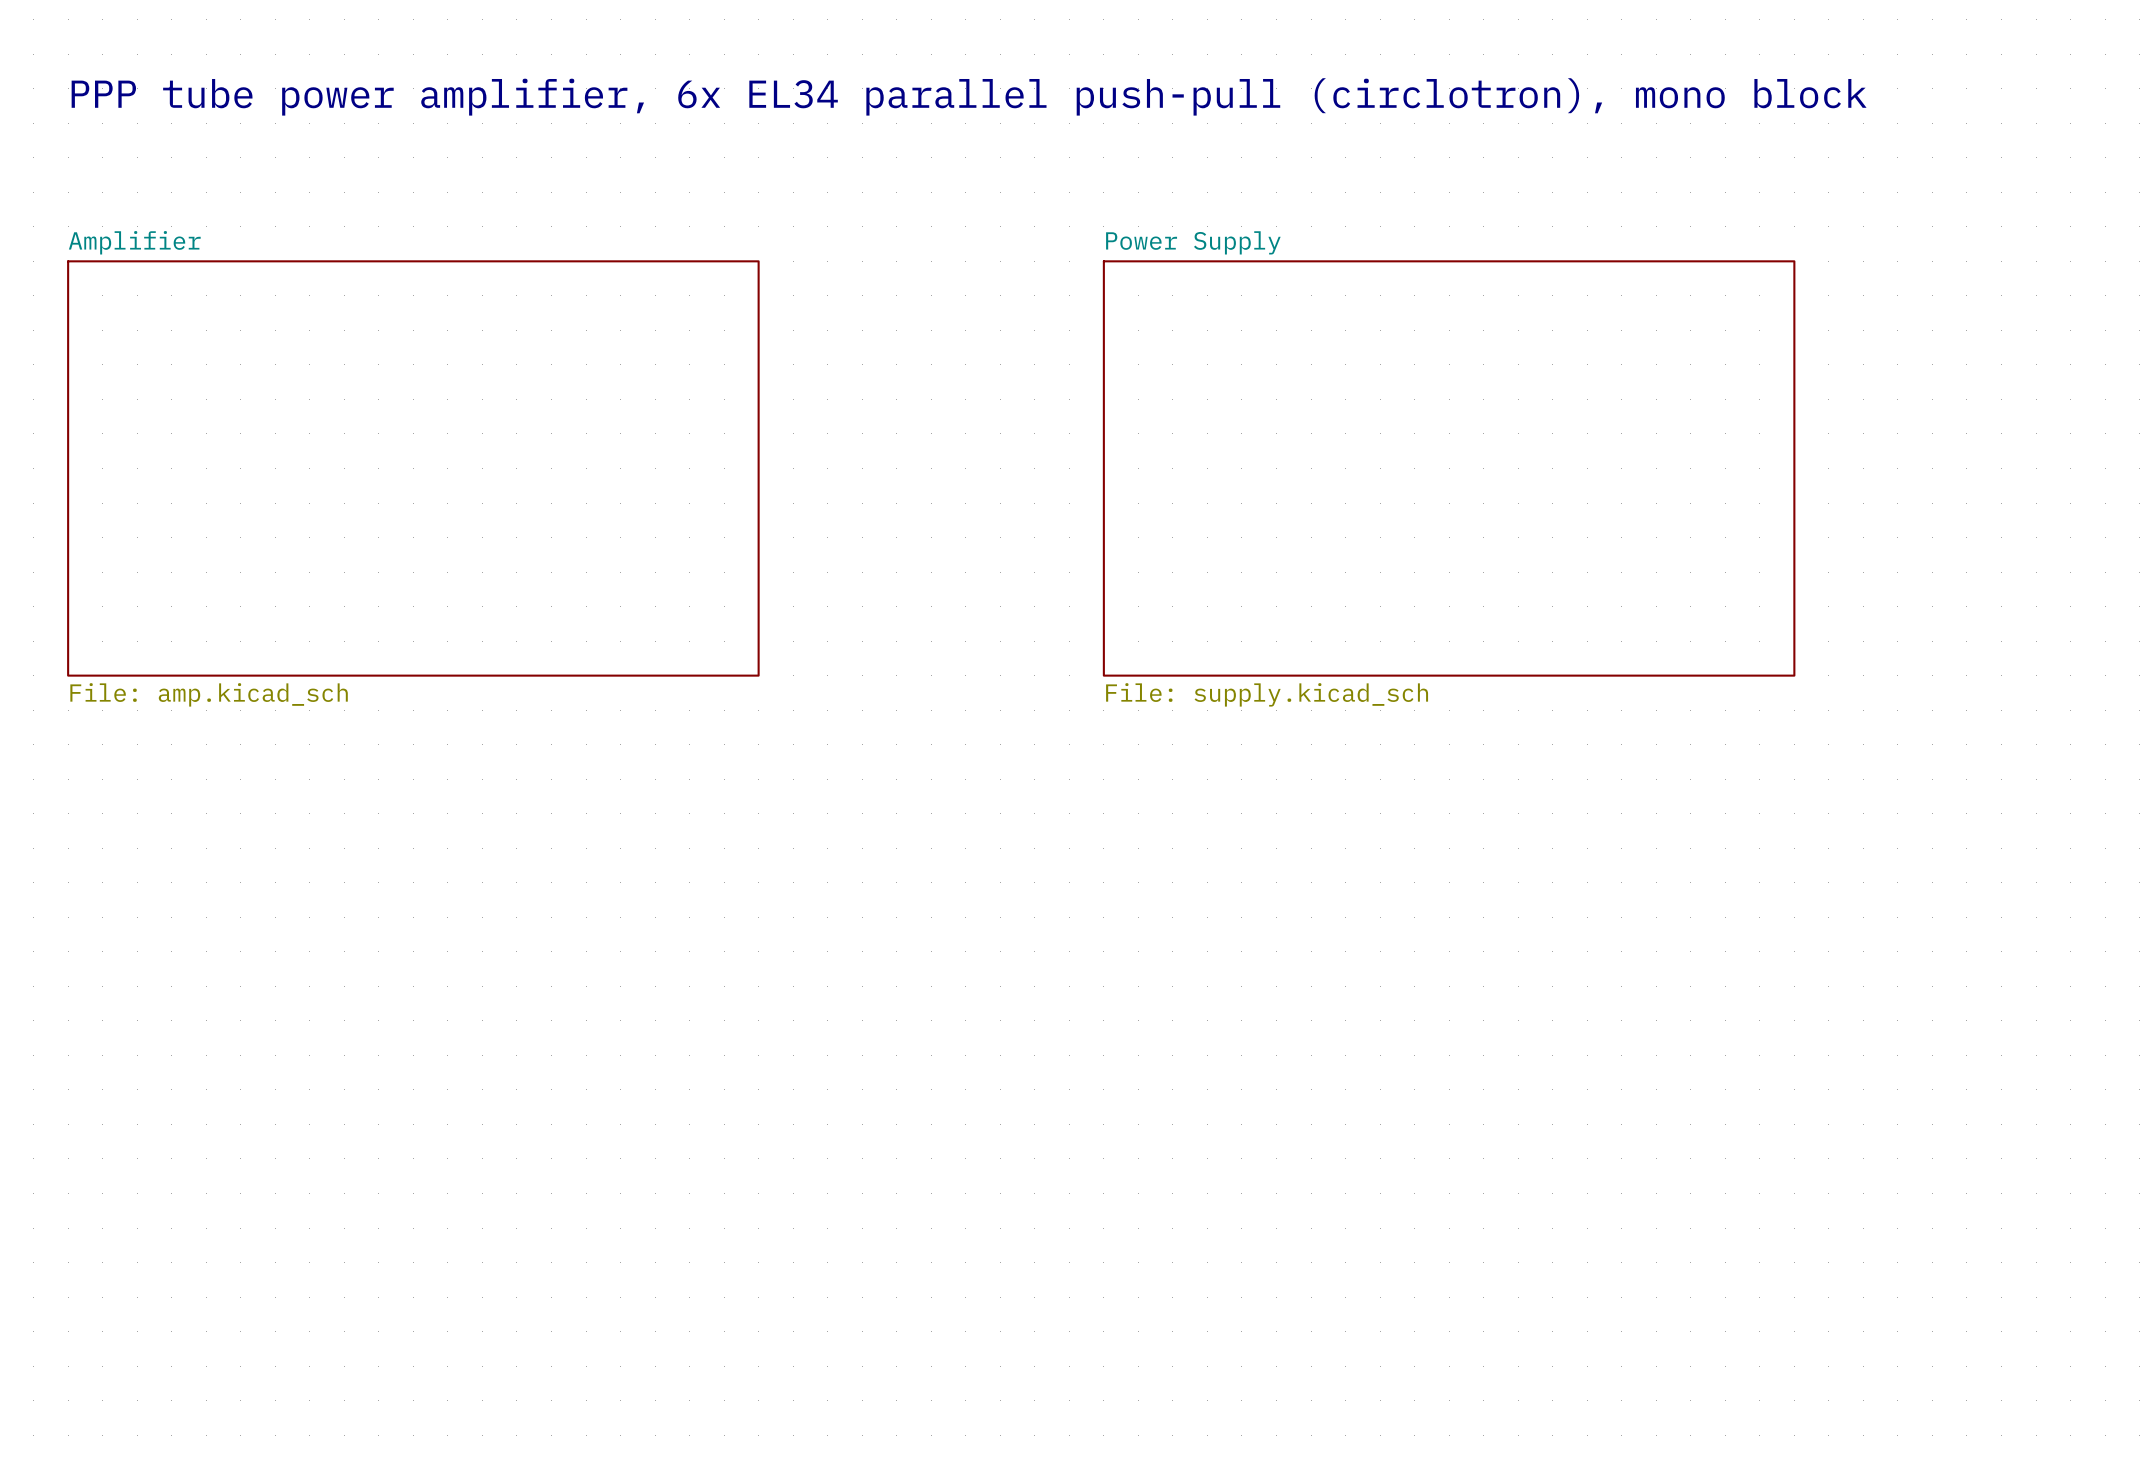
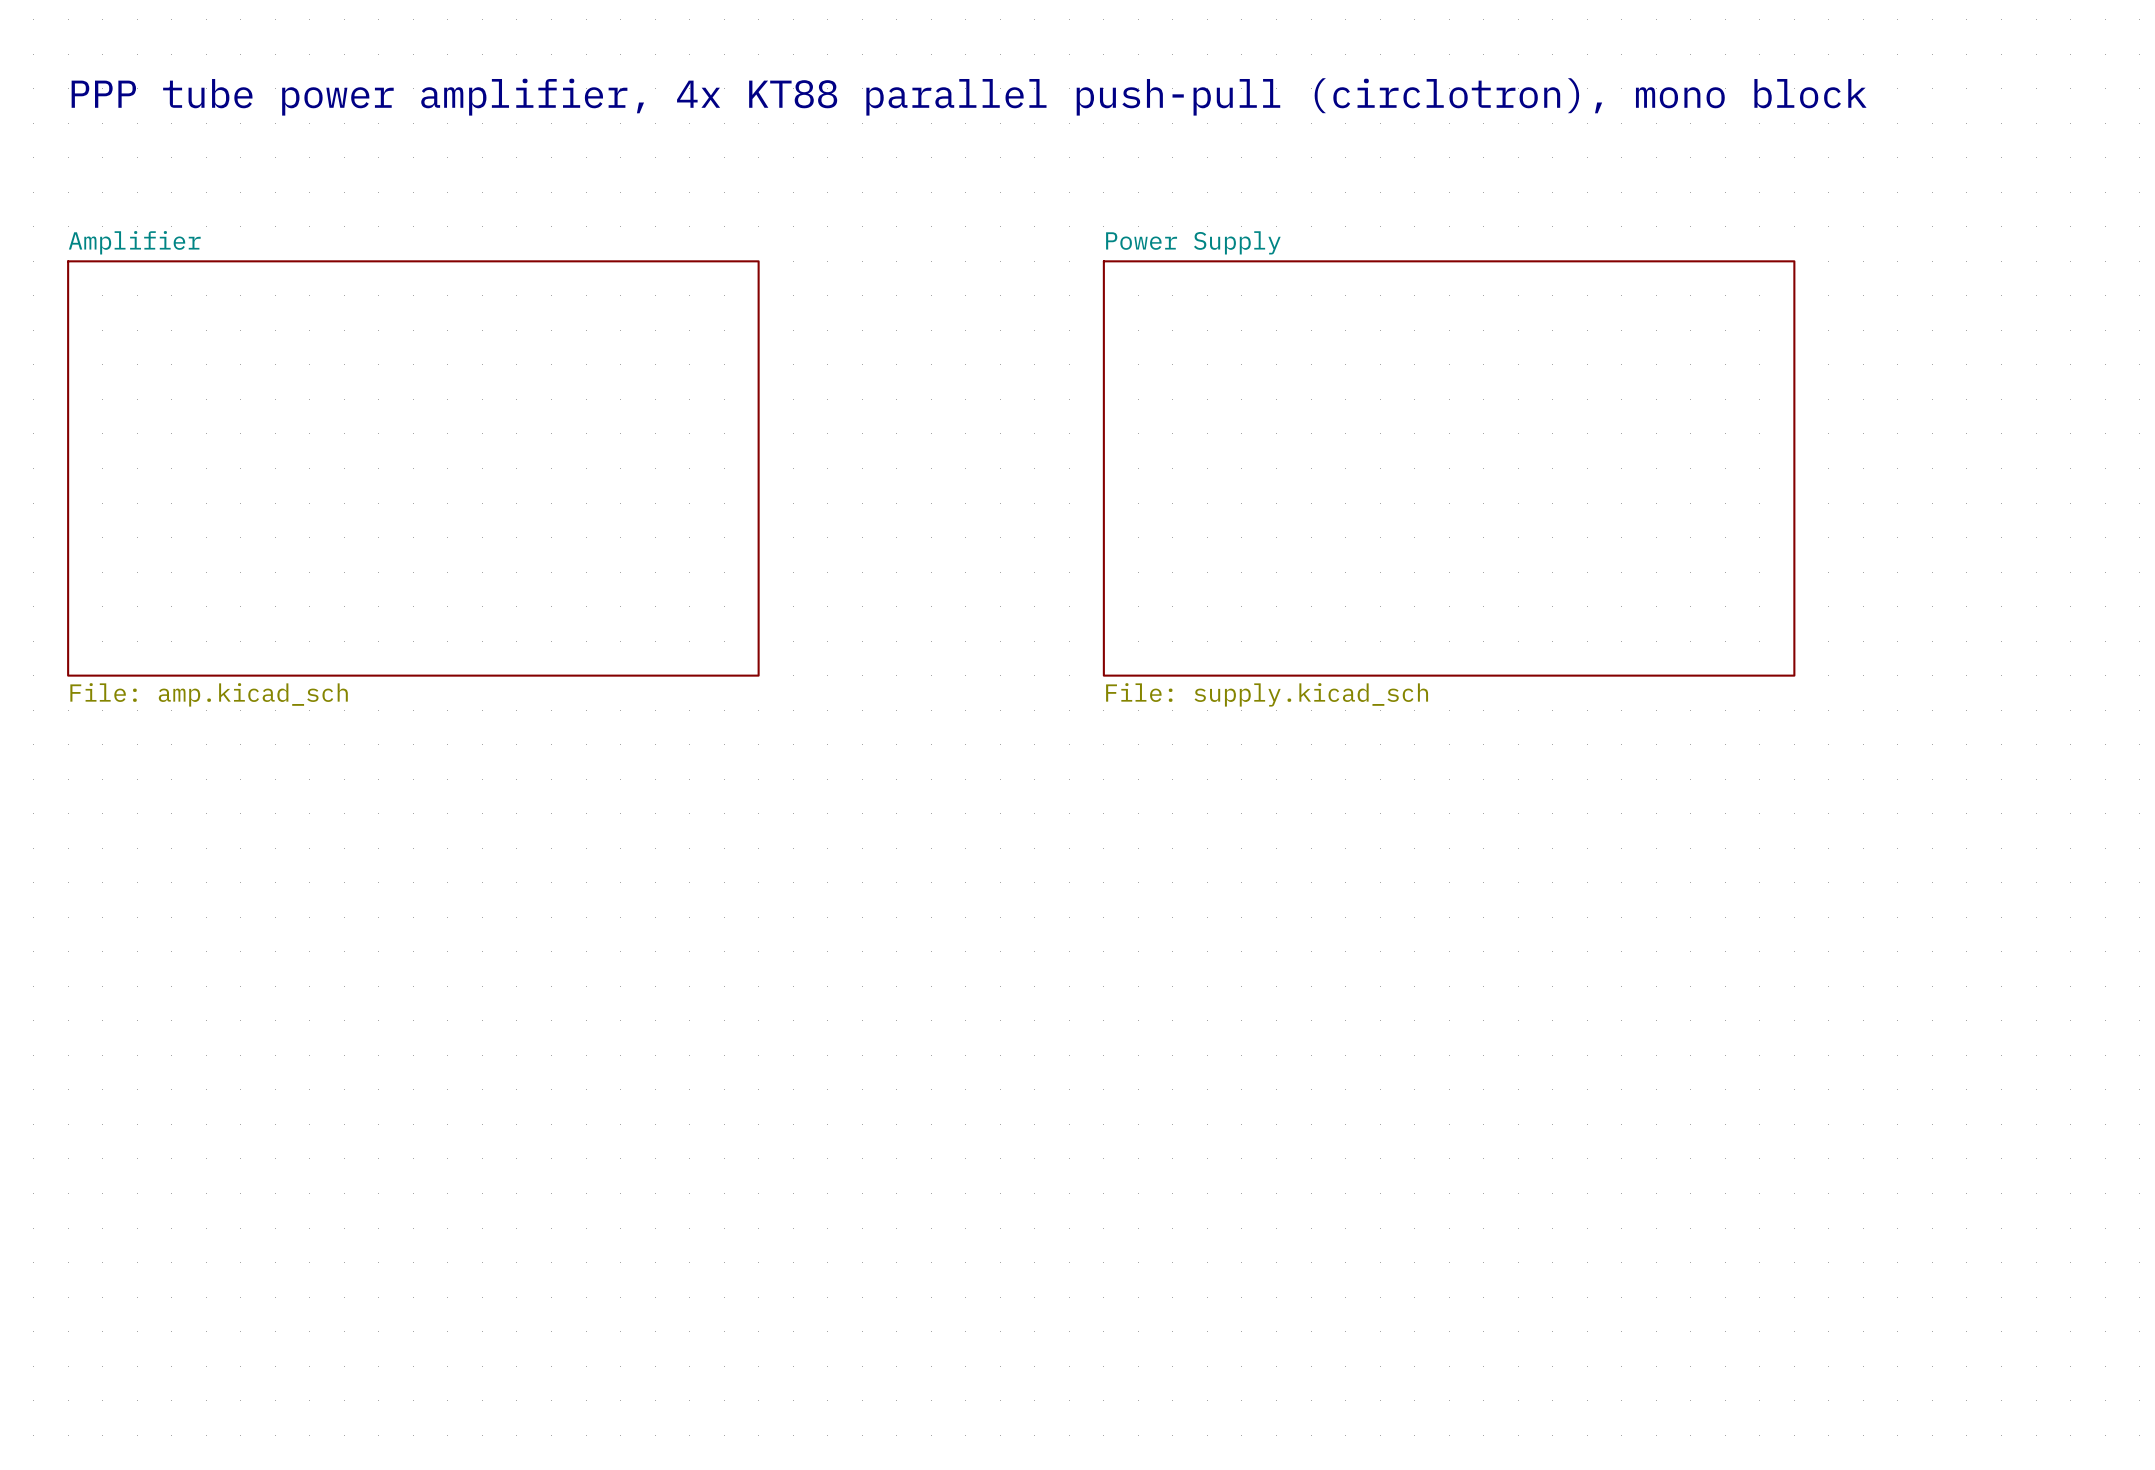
text: PPP tube power amplifier, 6x EL34 parallel push-pull (circlotron), mono block (969, 96) -> PPP tube power amplifier, 4x KT88 parallel push-pull (circlotron), mono block (969, 96)

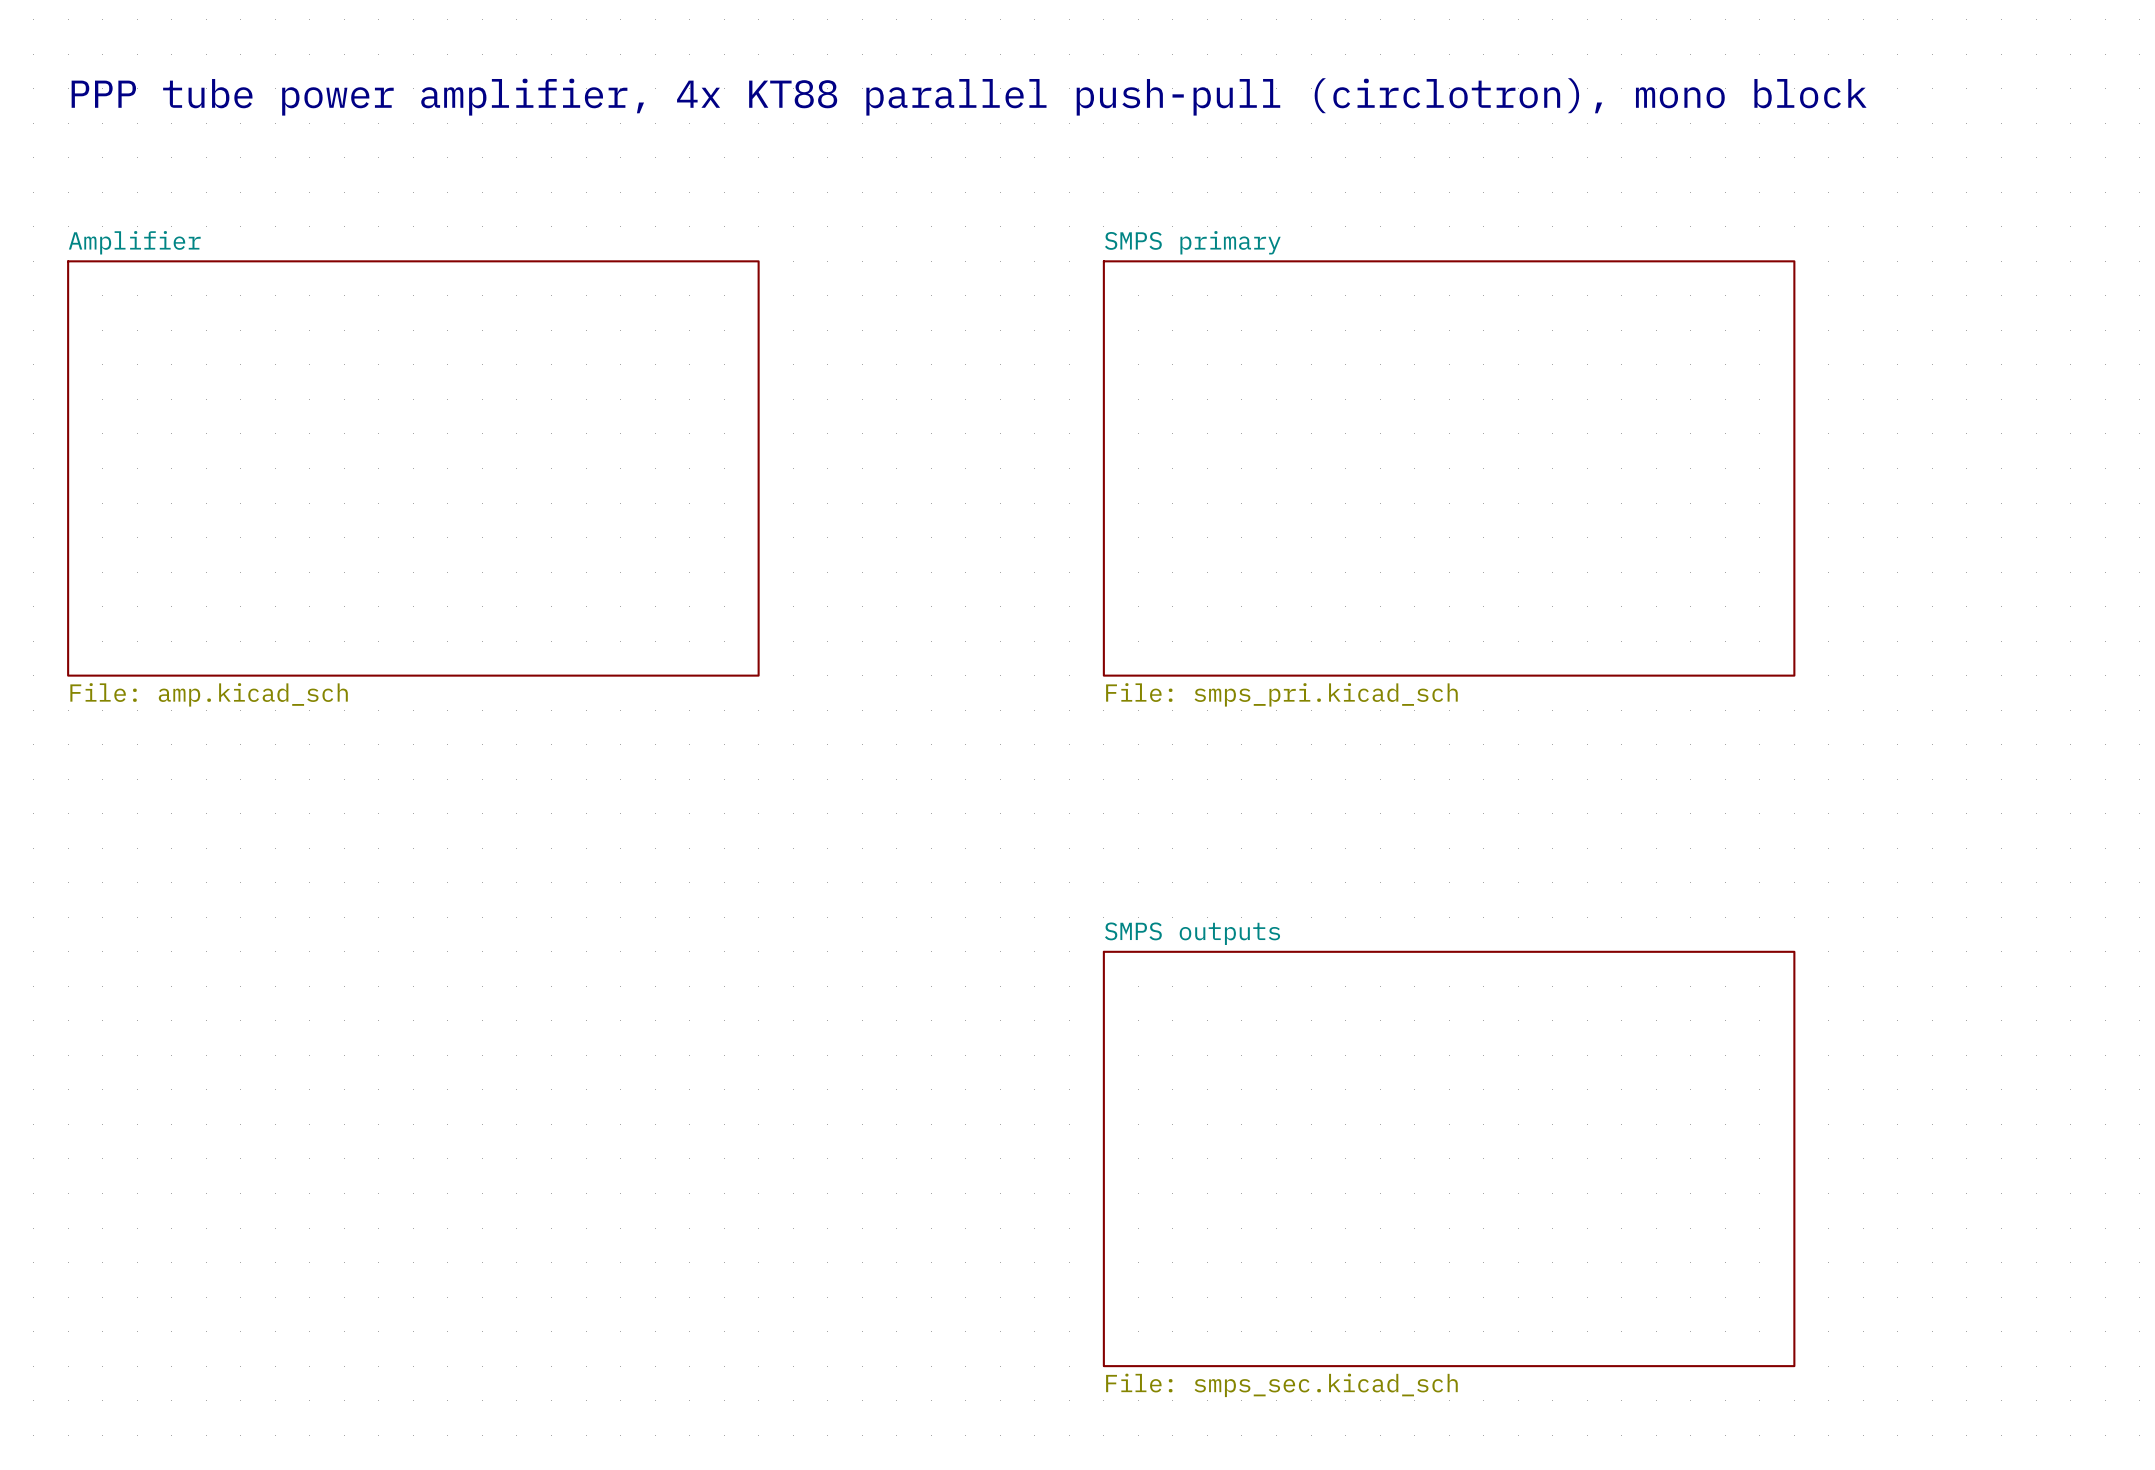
sheet Power Supply name: Power Supply (1193, 242) -> SMPS primary (1192, 242)
sheet Power Supply value: File: supply.kicad_sch (1267, 694) -> File: smps_pri.kicad_sch (1281, 694)
sheet SMPS outputs: none -> File: smps_sec.kicad_sch (1449, 1158)

